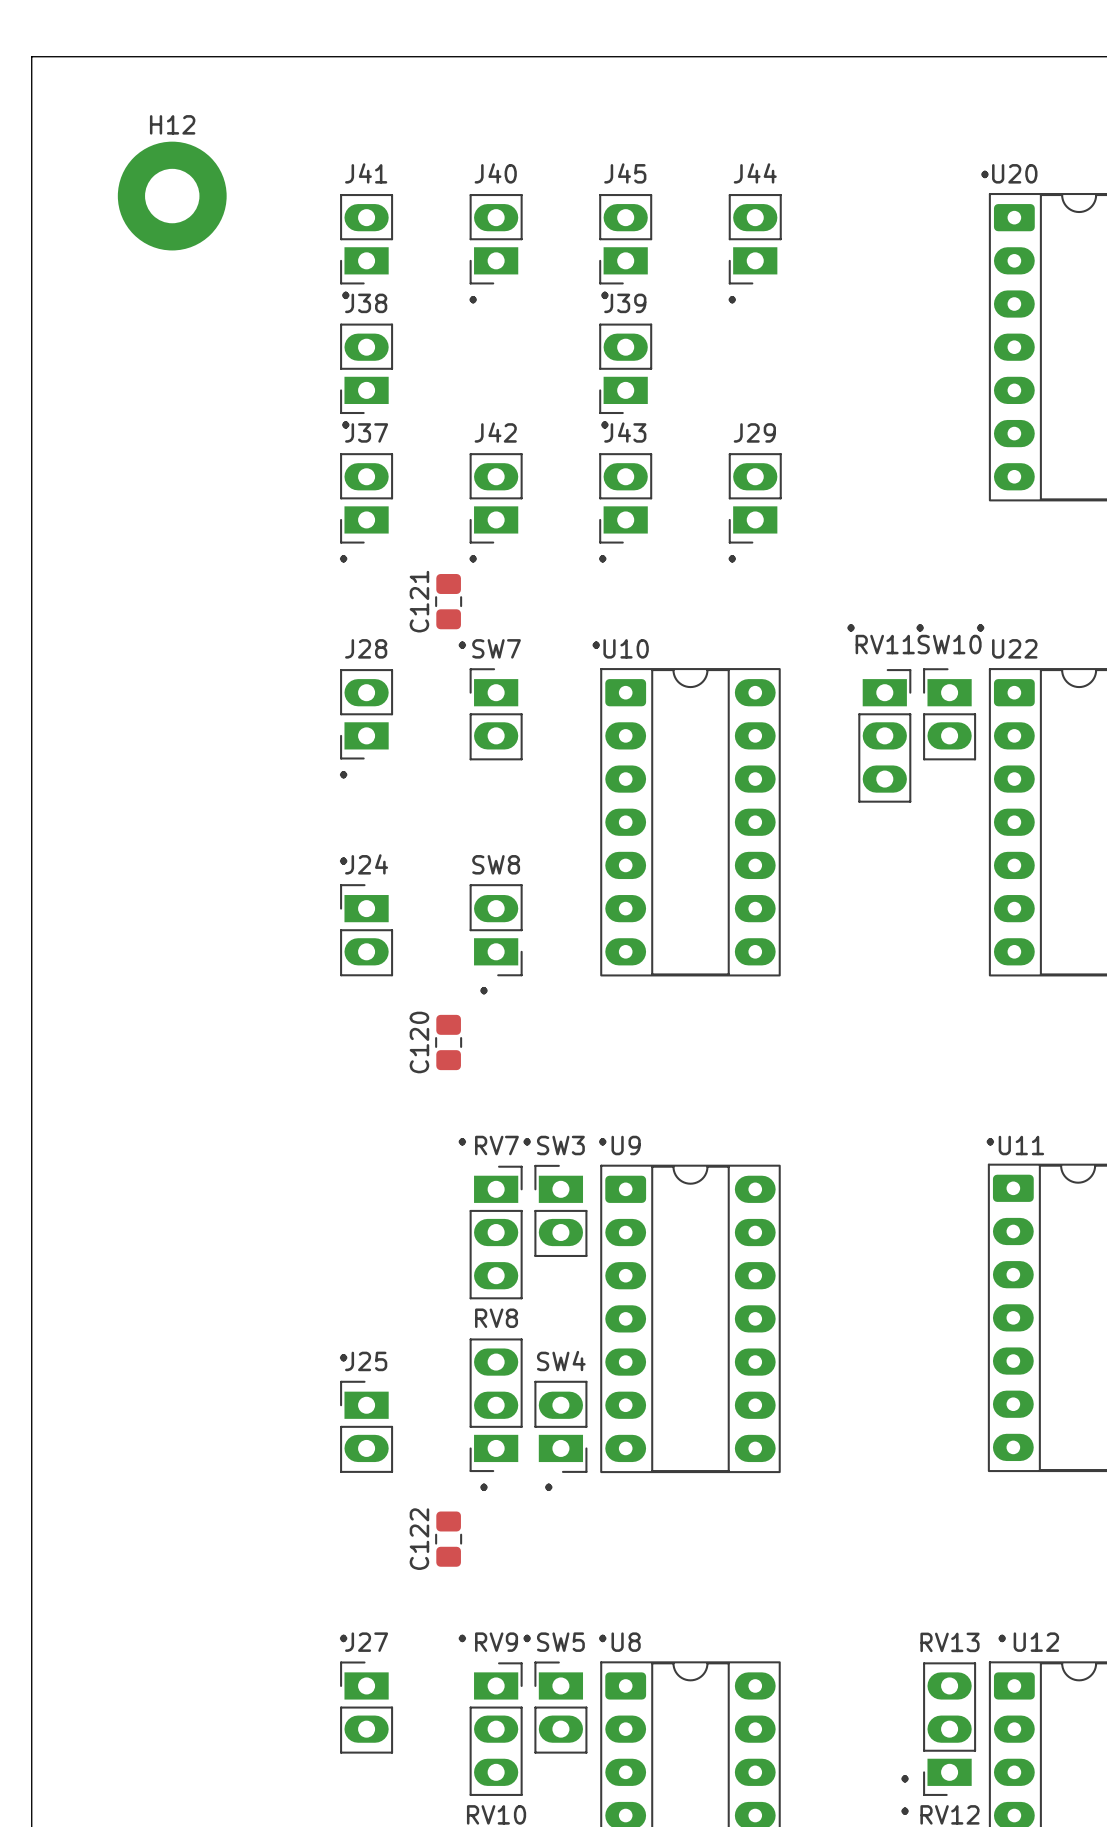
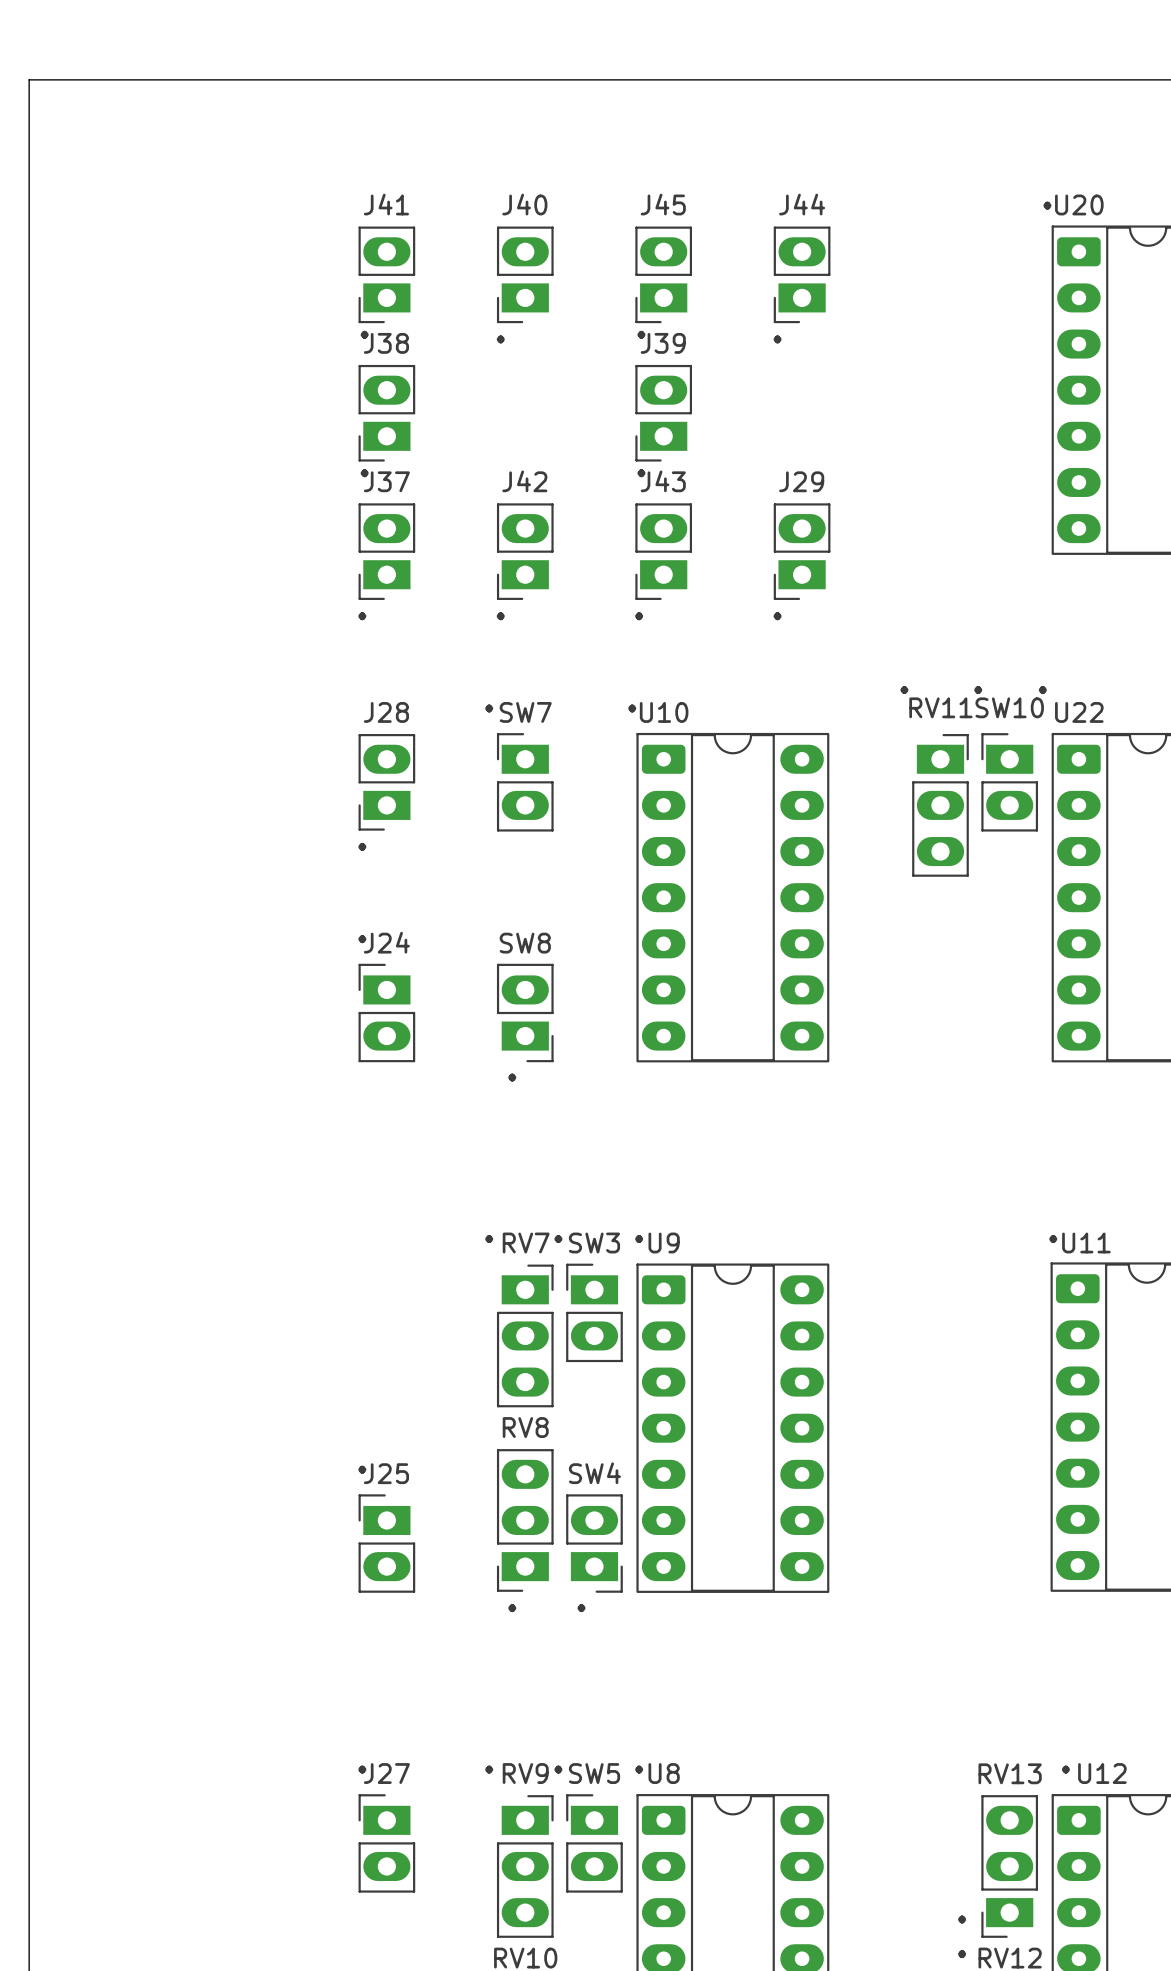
H12: (172, 196) -> none
C121: (448, 601) -> none
C120: (448, 1042) -> none
C122: (448, 1539) -> none

